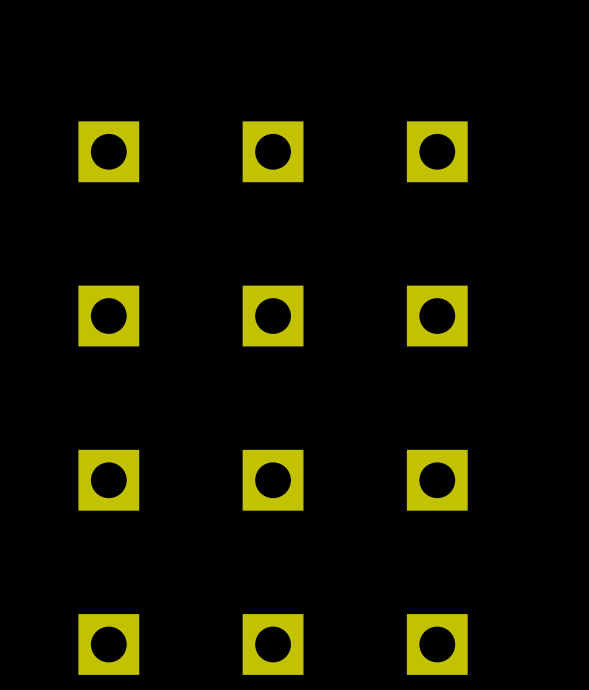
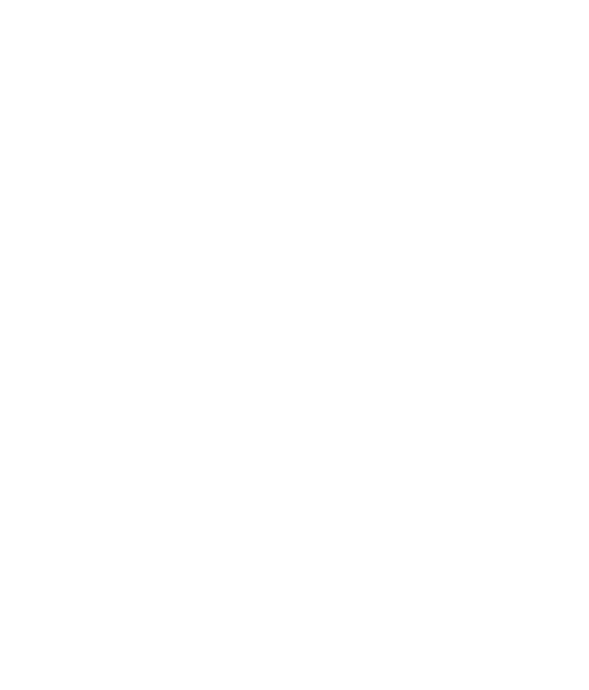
part: (108, 151) -> none
part: (273, 151) -> none
part: (437, 151) -> none
part: (108, 316) -> none
part: (273, 316) -> none
part: (437, 316) -> none
part: (108, 480) -> none
part: (273, 480) -> none
part: (437, 480) -> none
part: (108, 644) -> none
part: (273, 644) -> none
part: (437, 644) -> none

